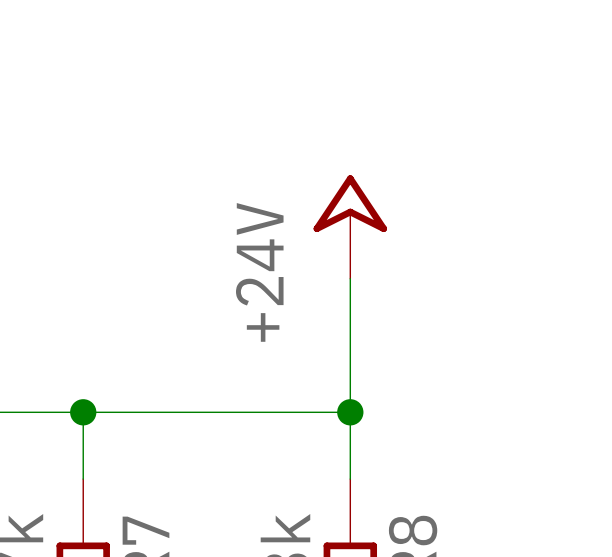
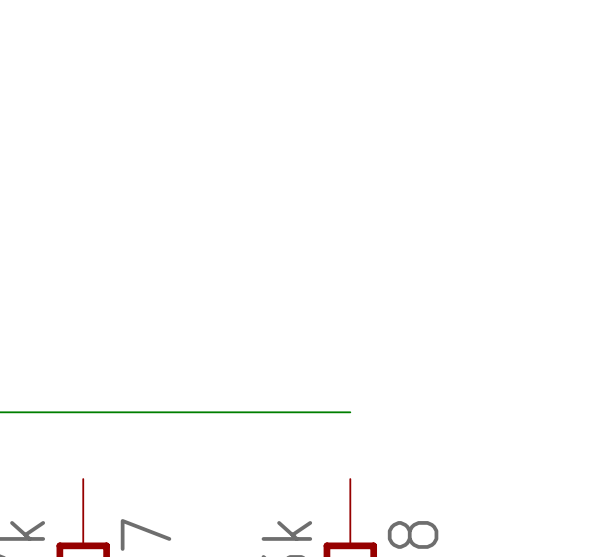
power symbol: +24V (350, 227) -> none
wire: (350, 278) (350, 479) -> none
wire: (83, 412) (83, 479) -> none
junction: (83, 412) -> none
junction: (350, 412) -> none

